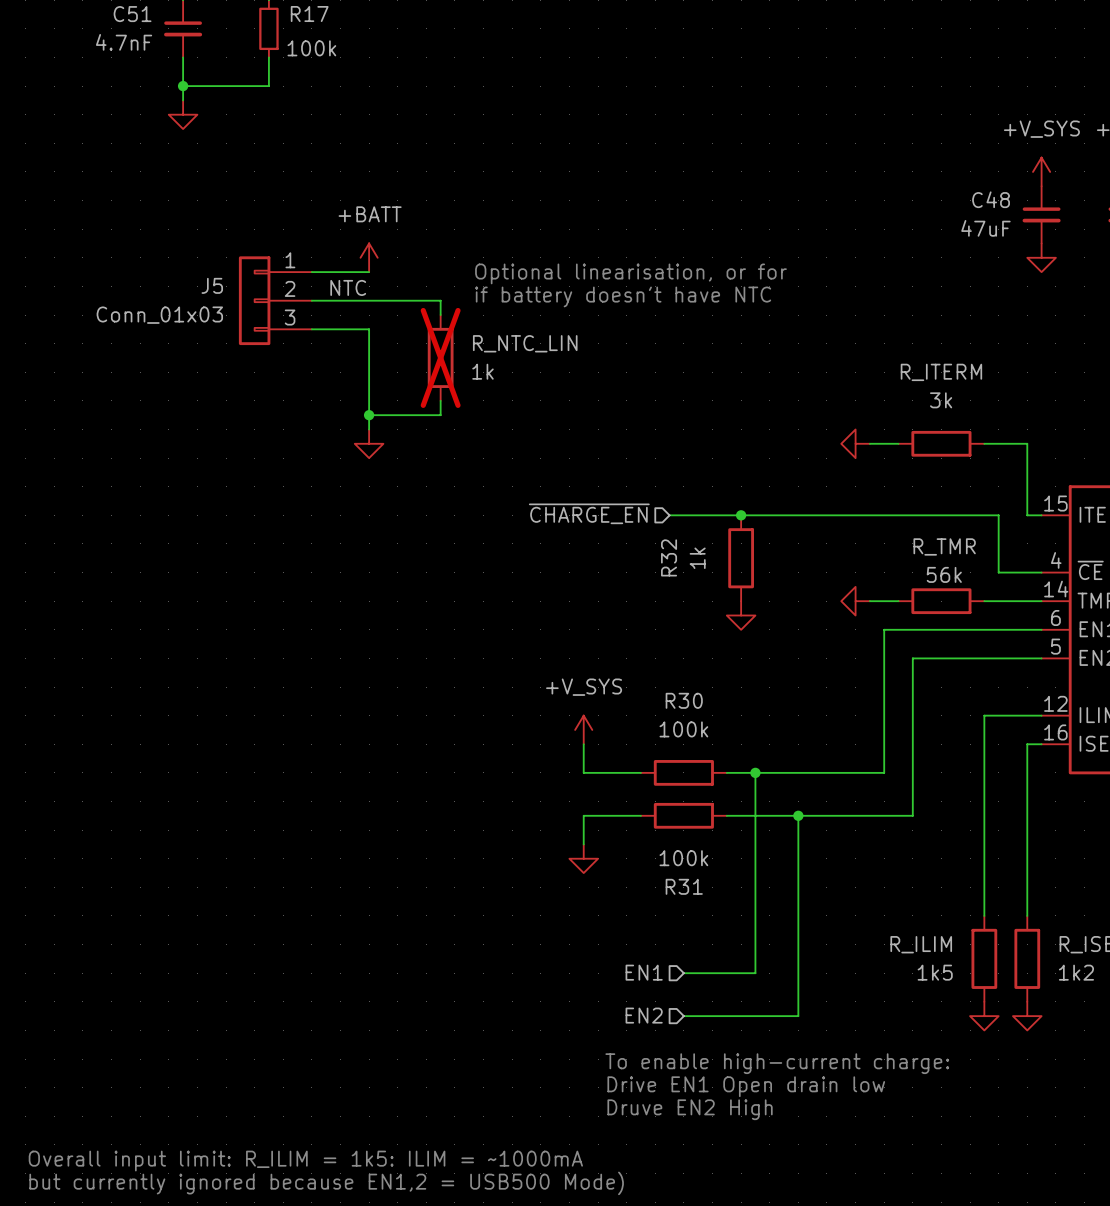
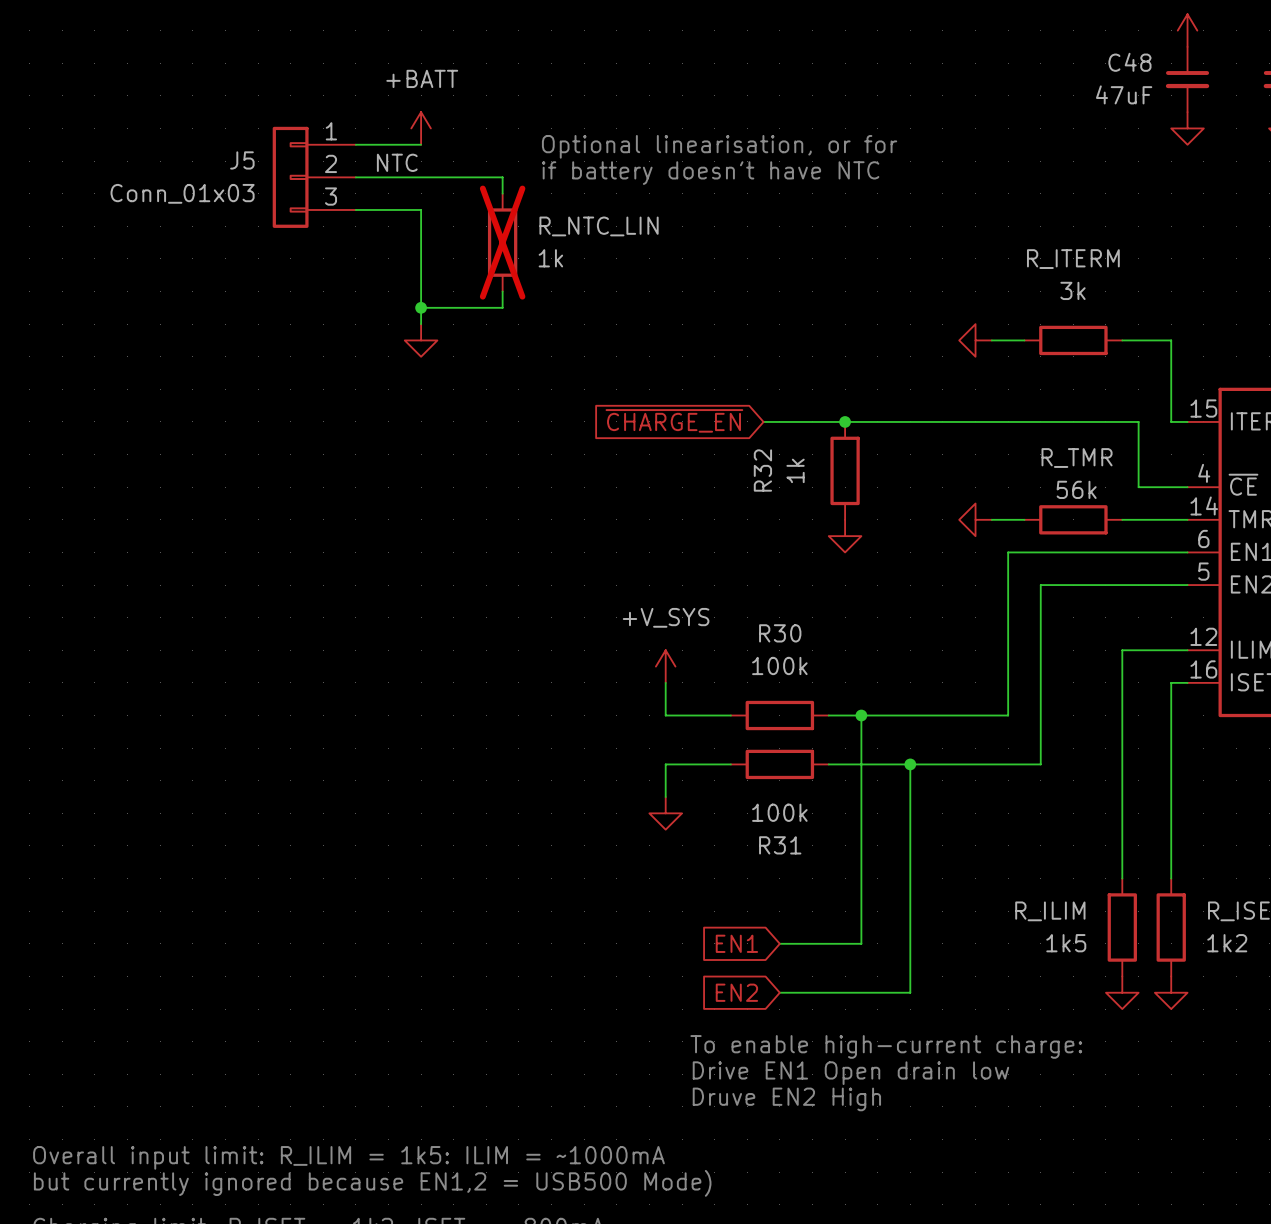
hierarchical label: ~{CHARGE_EN} (589, 513) -> none
global label: none -> ~{CHARGE_EN} (674, 420)
hierarchical label: EN1 (644, 972) -> none
global label: none -> EN1 (736, 943)
hierarchical label: EN2 (644, 1015) -> none
global label: none -> EN2 (736, 992)

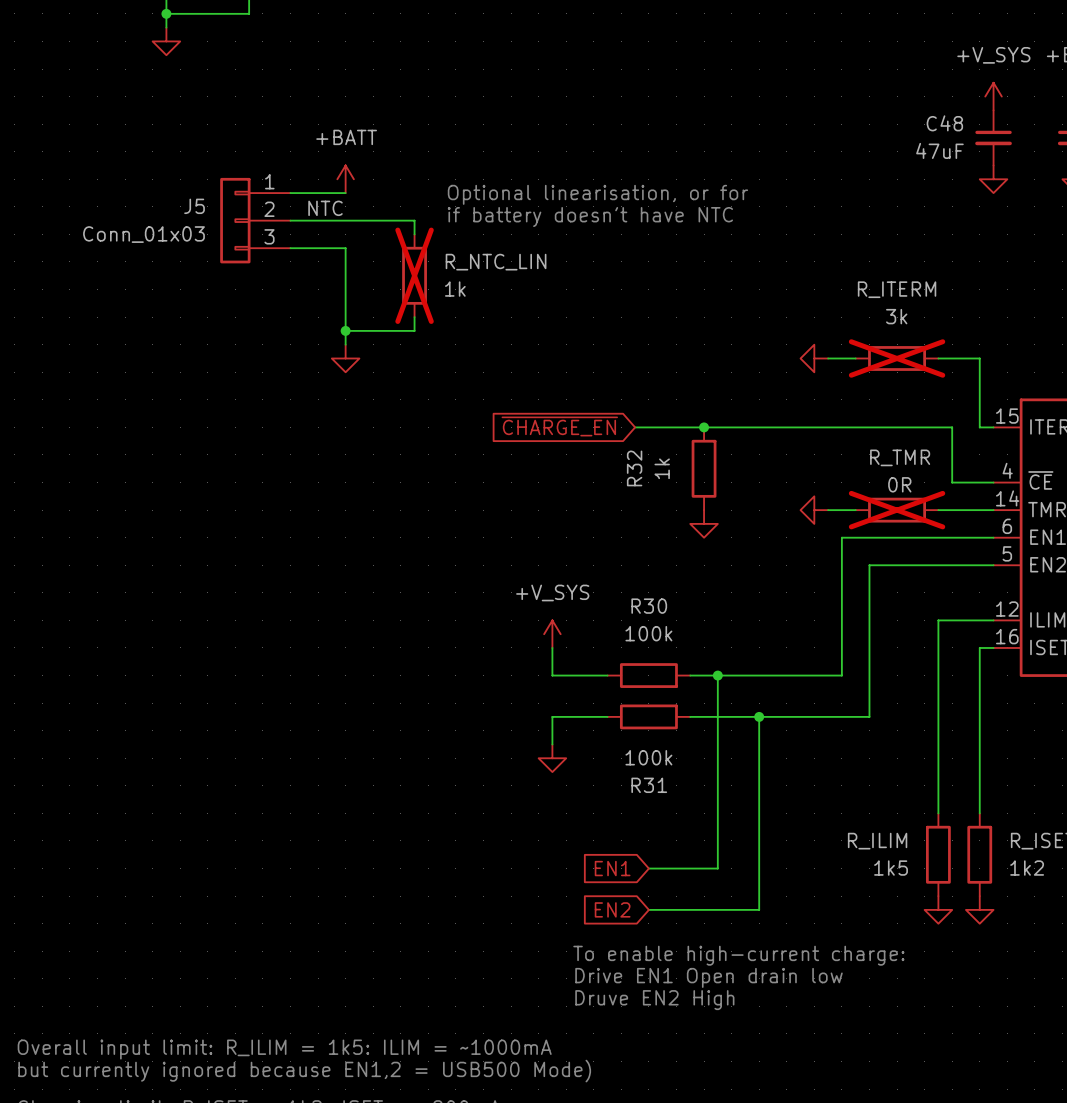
R_ITERM do-not-place cross: none -> (897, 358)
R_TMR value: 56k (1076, 489) -> 0R (899, 484)
R_TMR do-not-place cross: none -> (897, 510)

